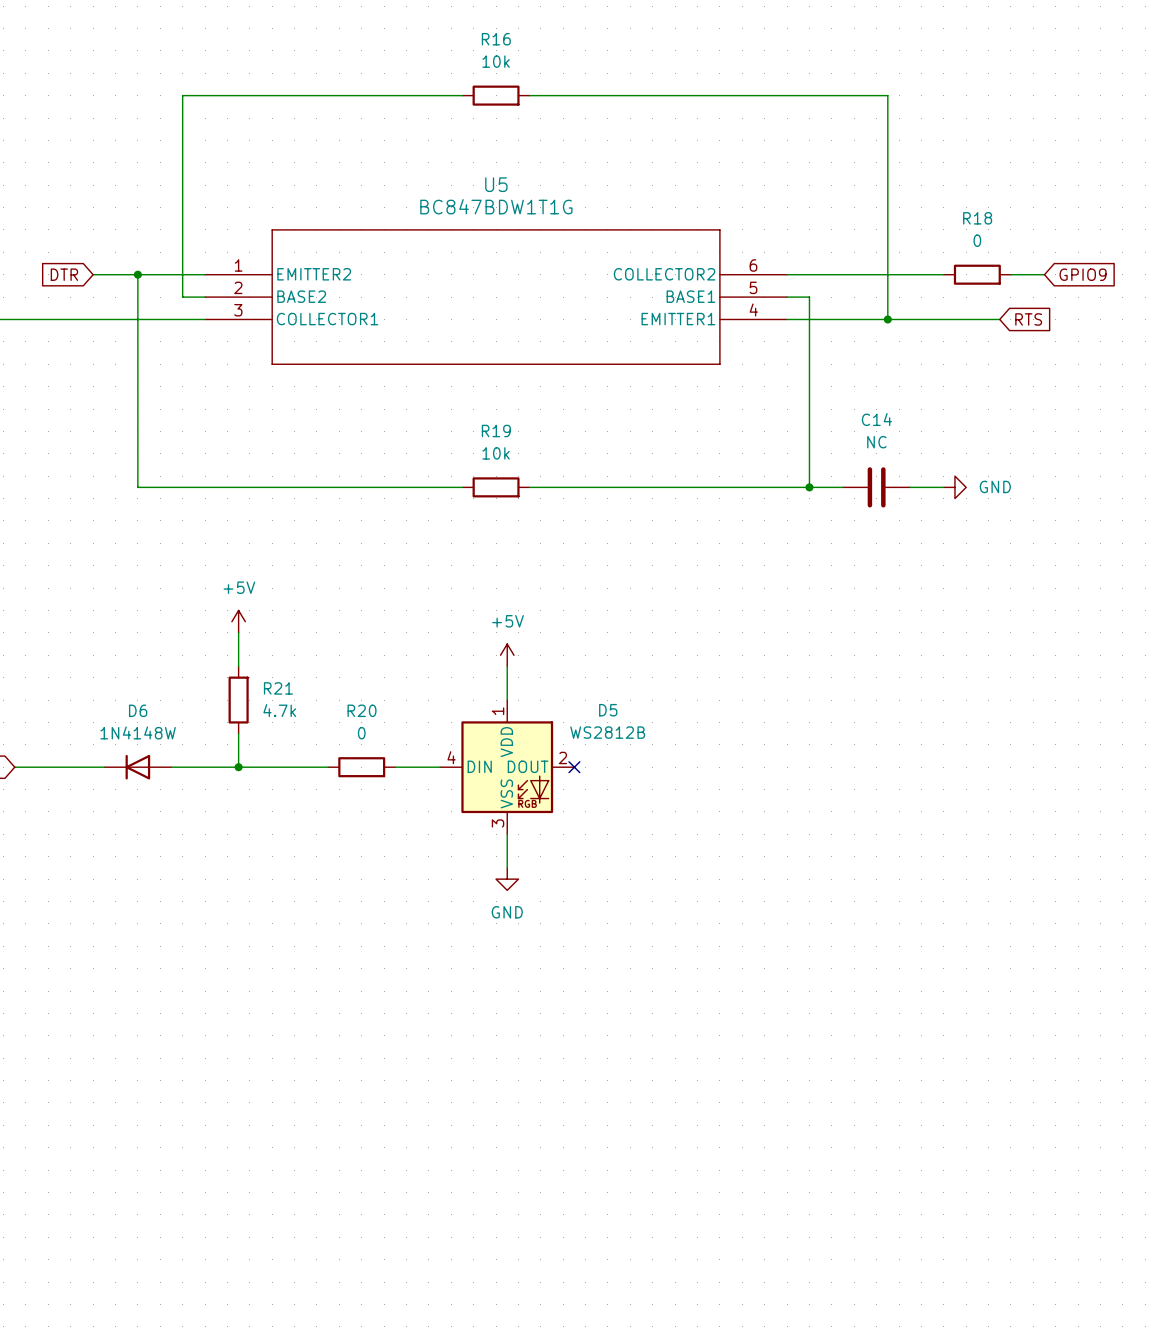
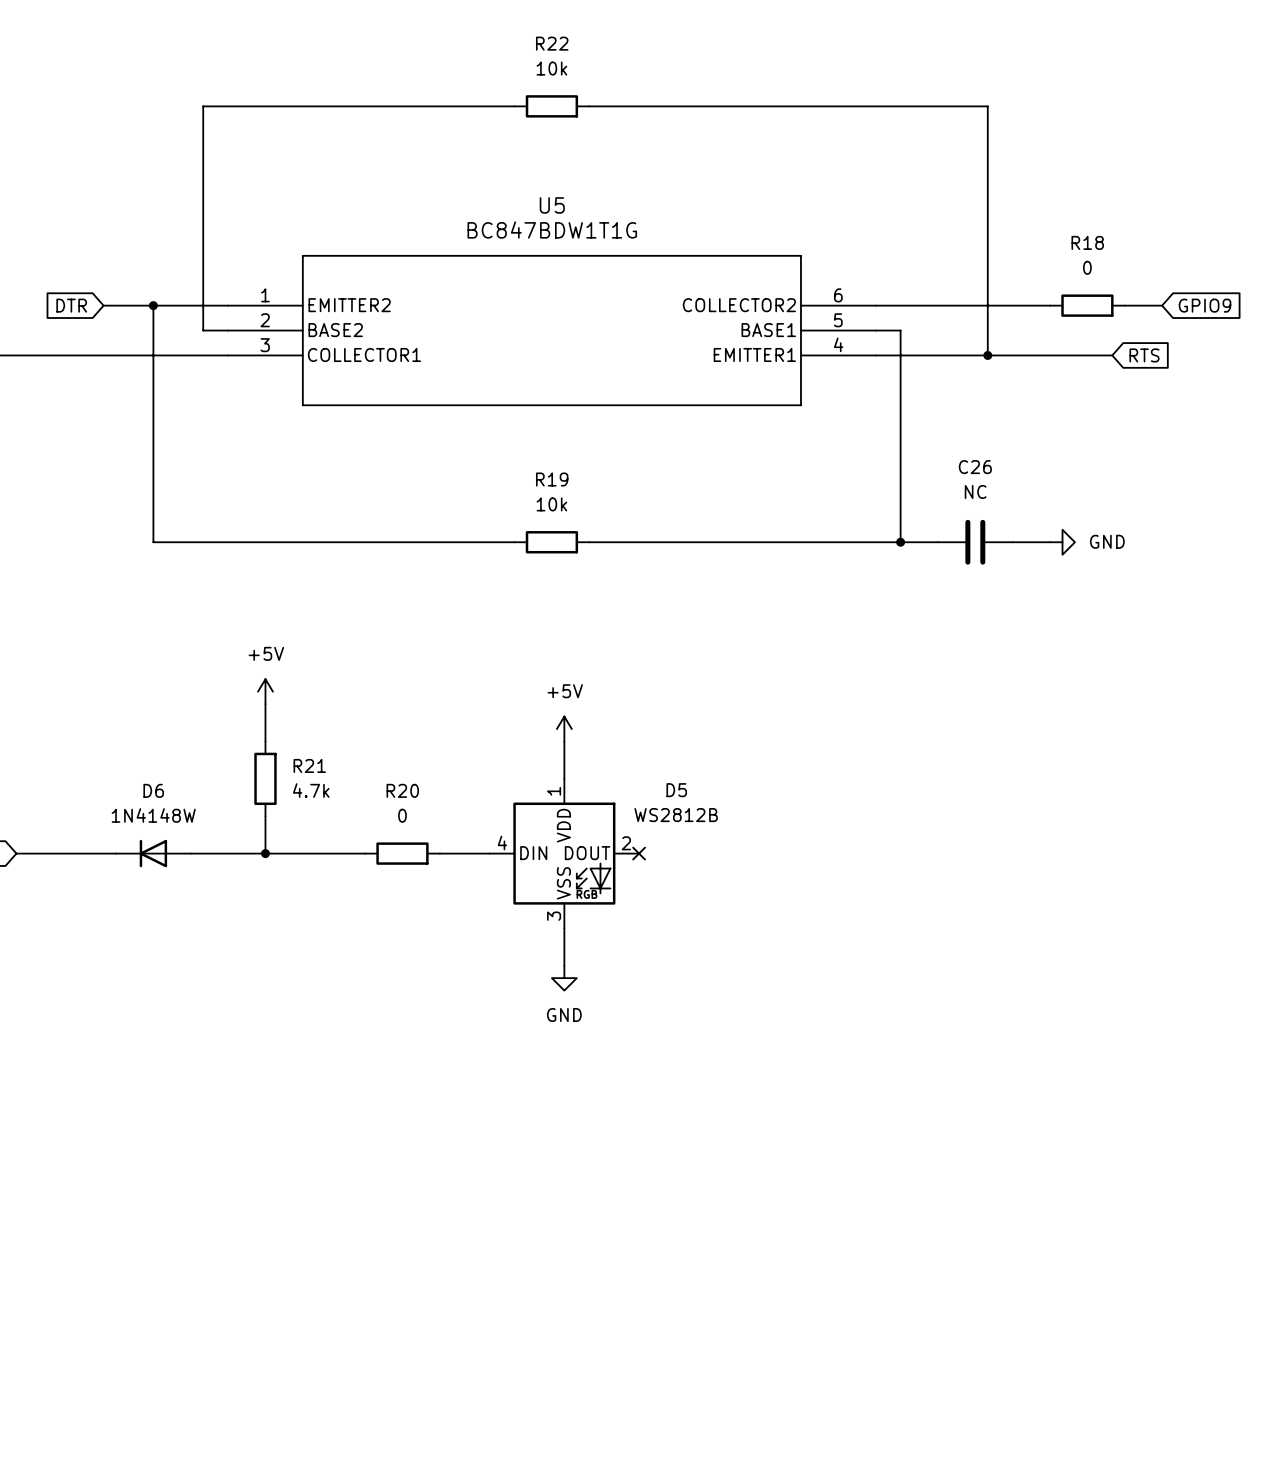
R16 name: R16 (496, 39) -> R22 (552, 43)
C14 name: C14 (876, 419) -> C26 (975, 467)

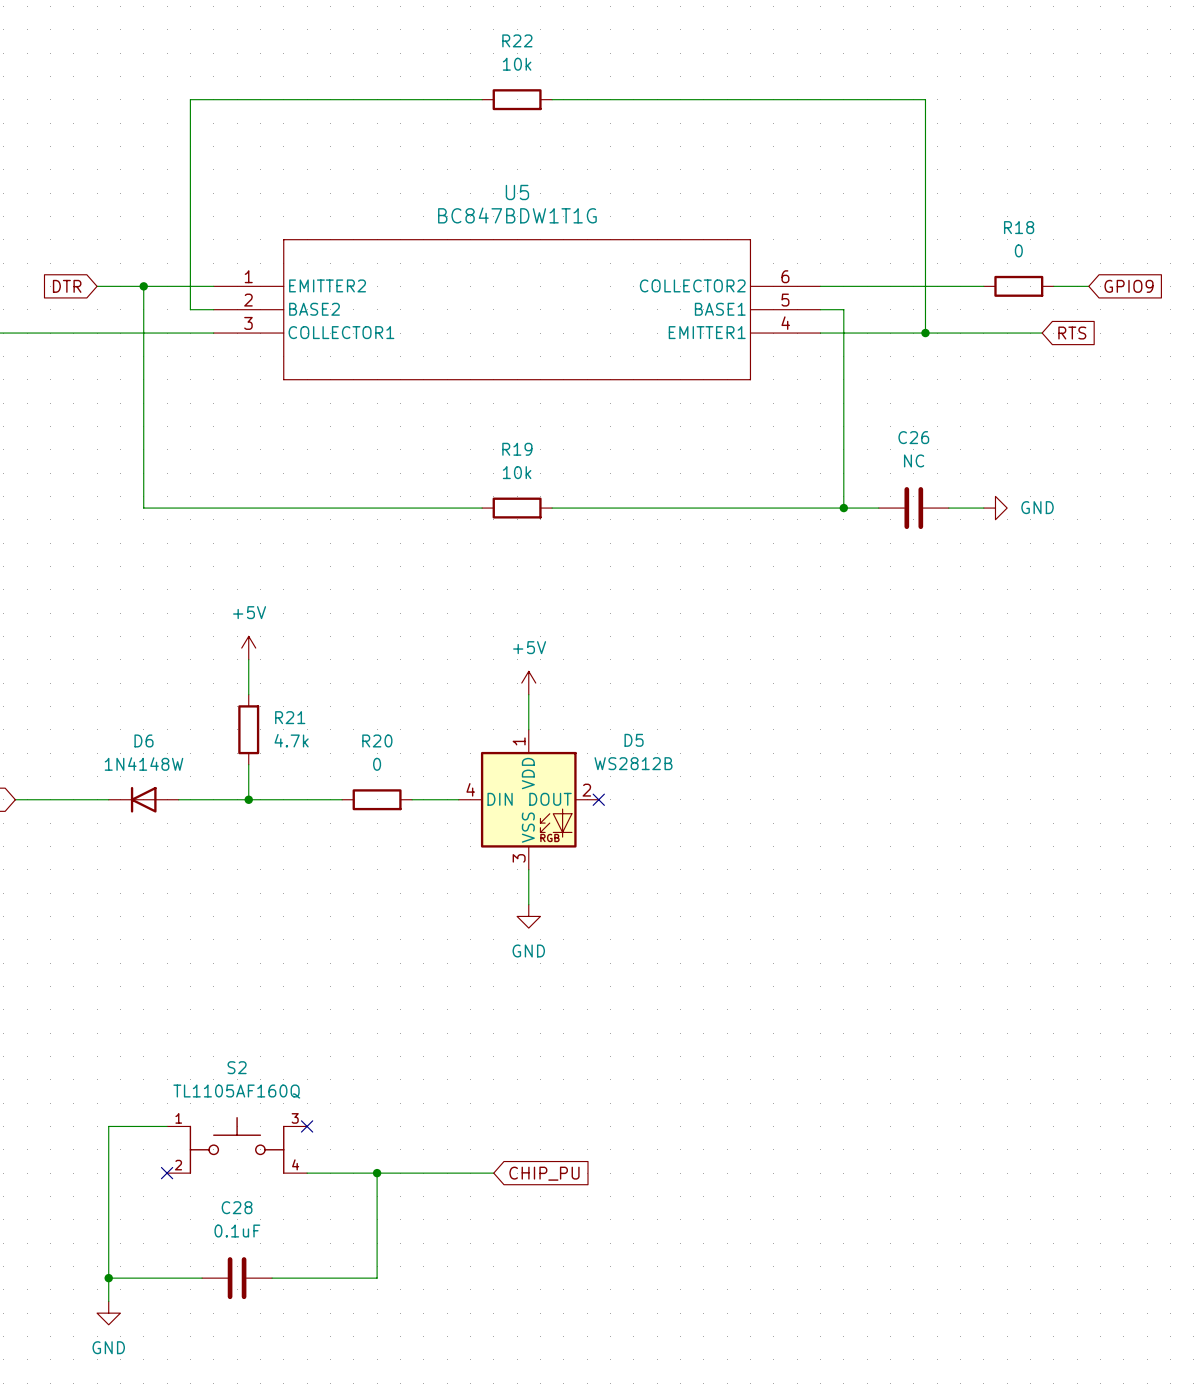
wire: none -> (167, 1126) (108, 1126) (108, 1301)
no-connect mark: none -> (307, 1126)
S2: none -> TL1105AF160Q (237, 1145)
no-connect mark: none -> (167, 1173)
wire: none -> (307, 1173) (493, 1173)
wire: none -> (377, 1173) (377, 1278) (272, 1278)
junction: none -> (377, 1173)
global label: none -> CHIP_PU (544, 1173)
wire: none -> (108, 1278) (202, 1278)
junction: none -> (108, 1278)
C28: none -> 0.1uF (237, 1278)
power symbol: none -> GND (108, 1313)

